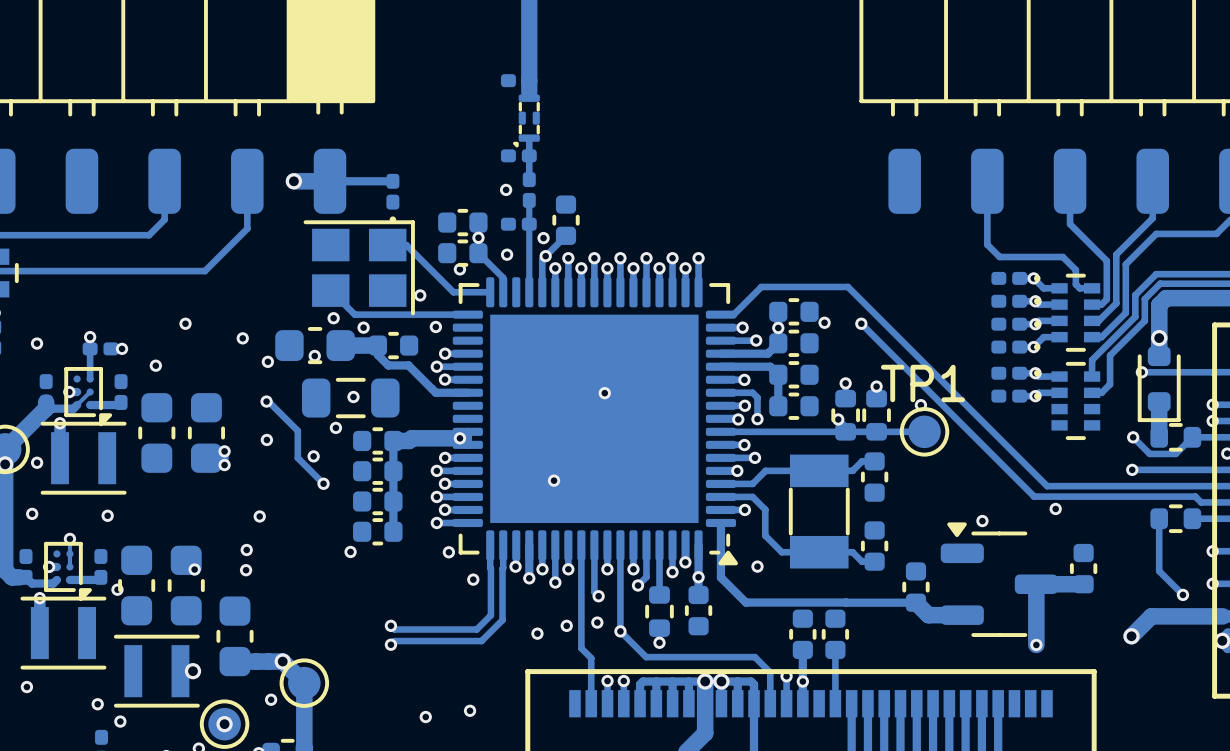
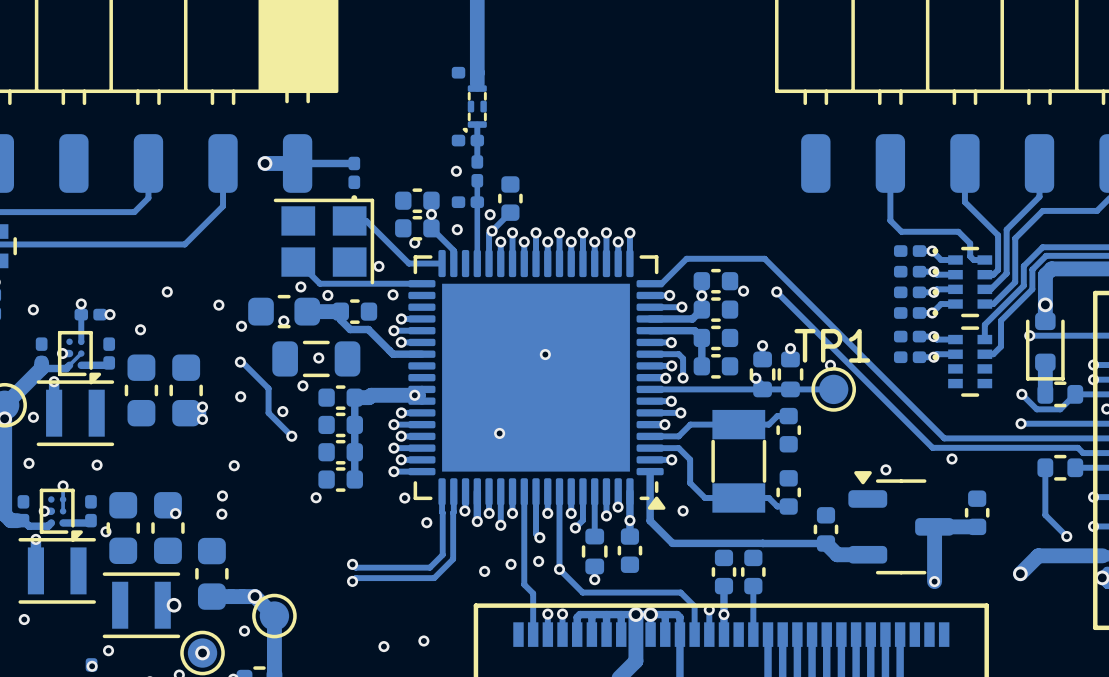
via: (97, 704) -> none
via: none -> (92, 666)

